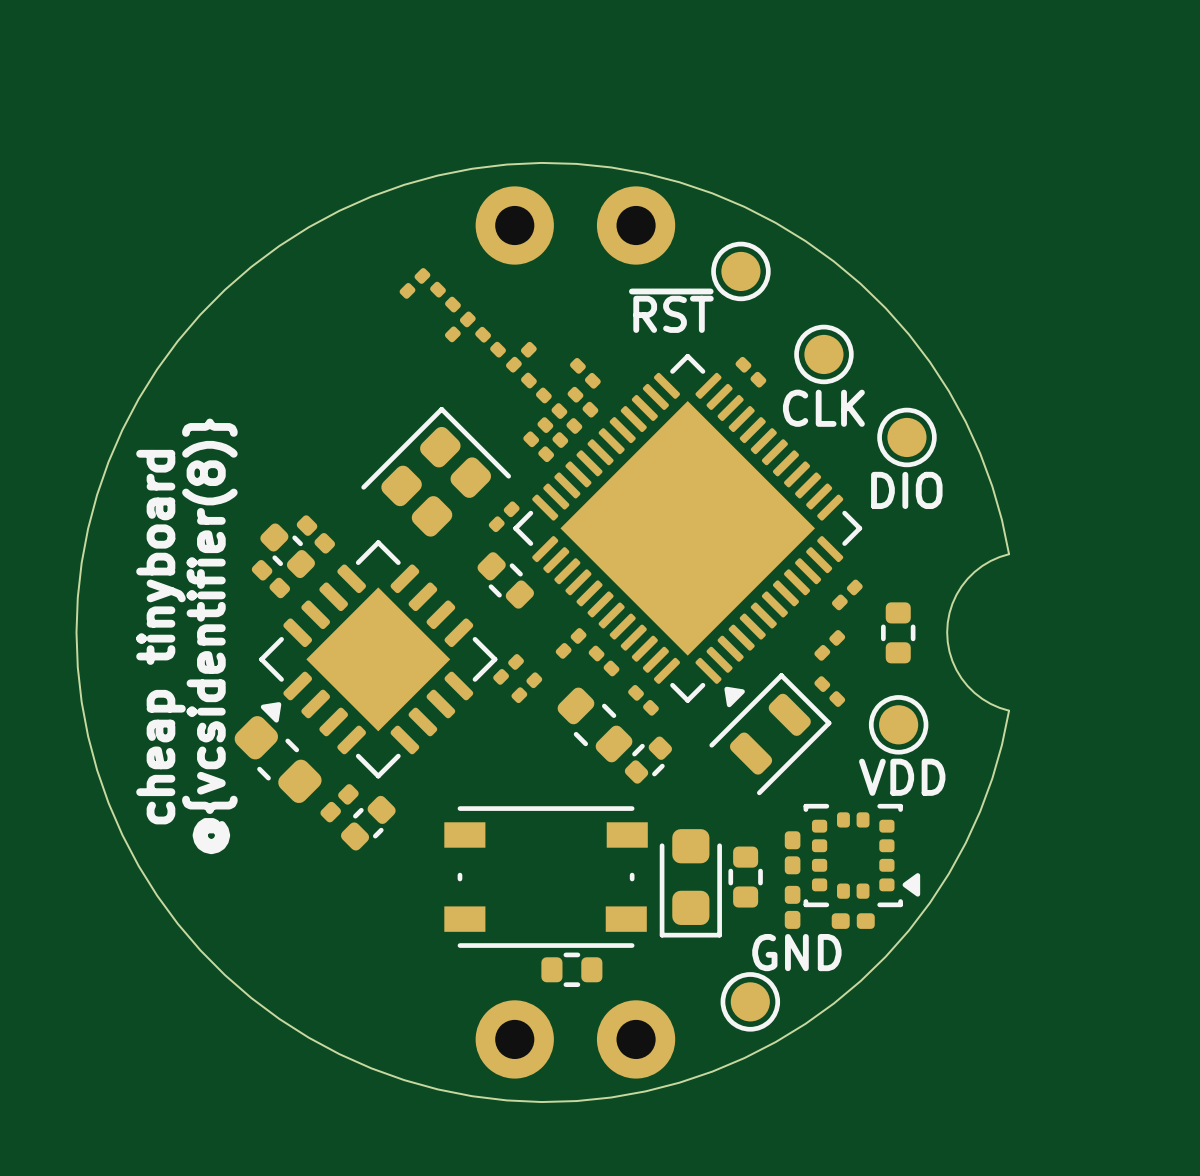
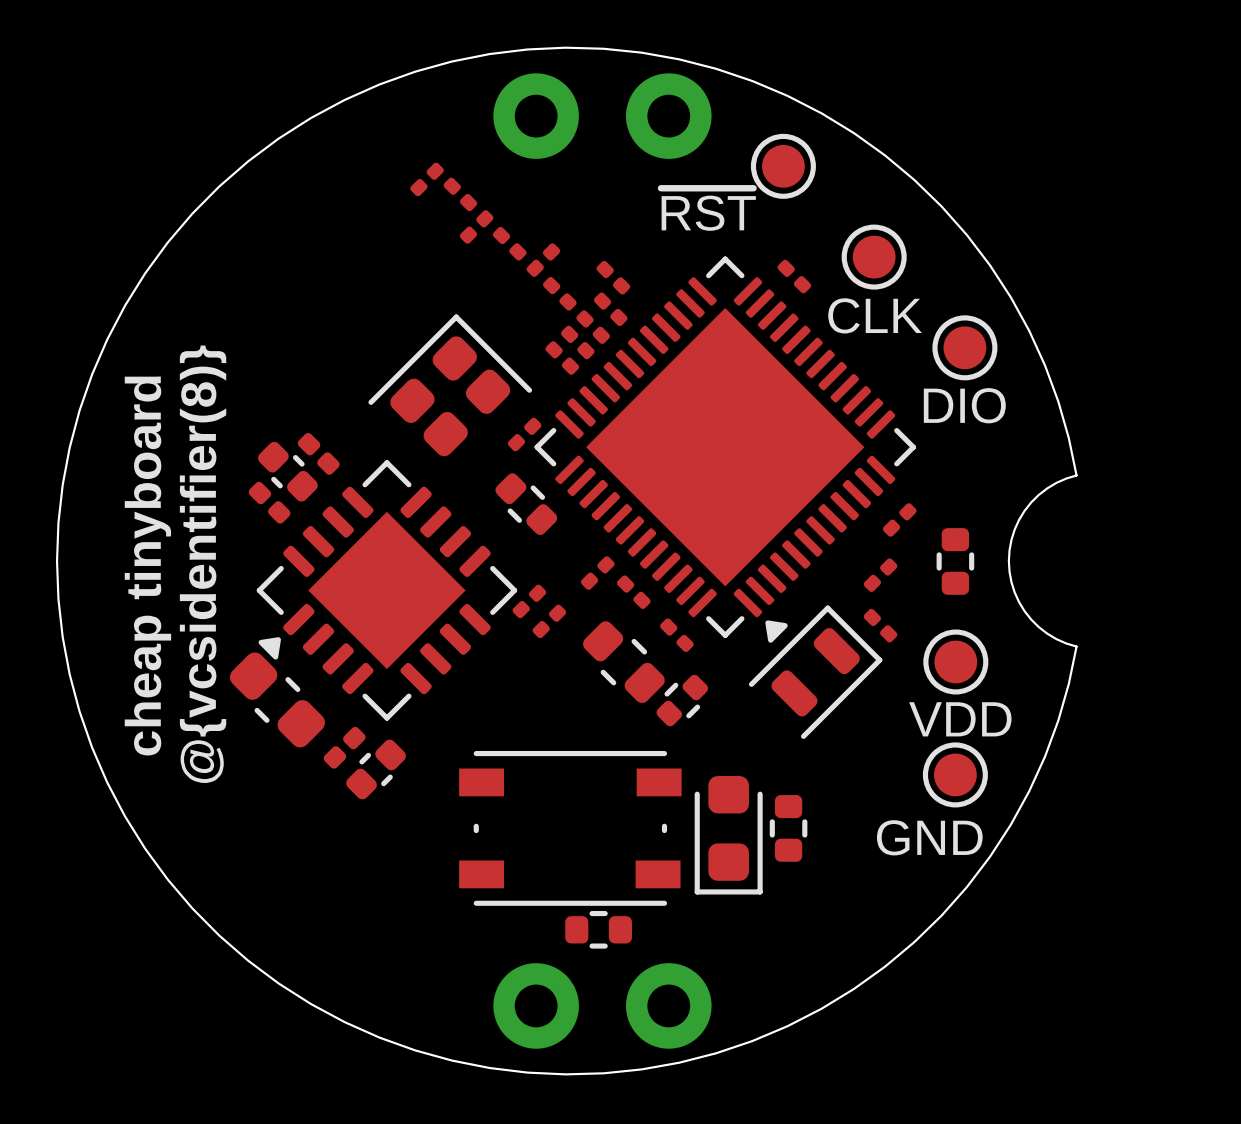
part: (792, 852) -> none
part: (861, 855) -> none
part: (792, 907) -> none
part: (853, 921) -> none
text position: GND (796, 952) -> GND (929, 837)
part position: (750, 1001) -> (955, 774)

